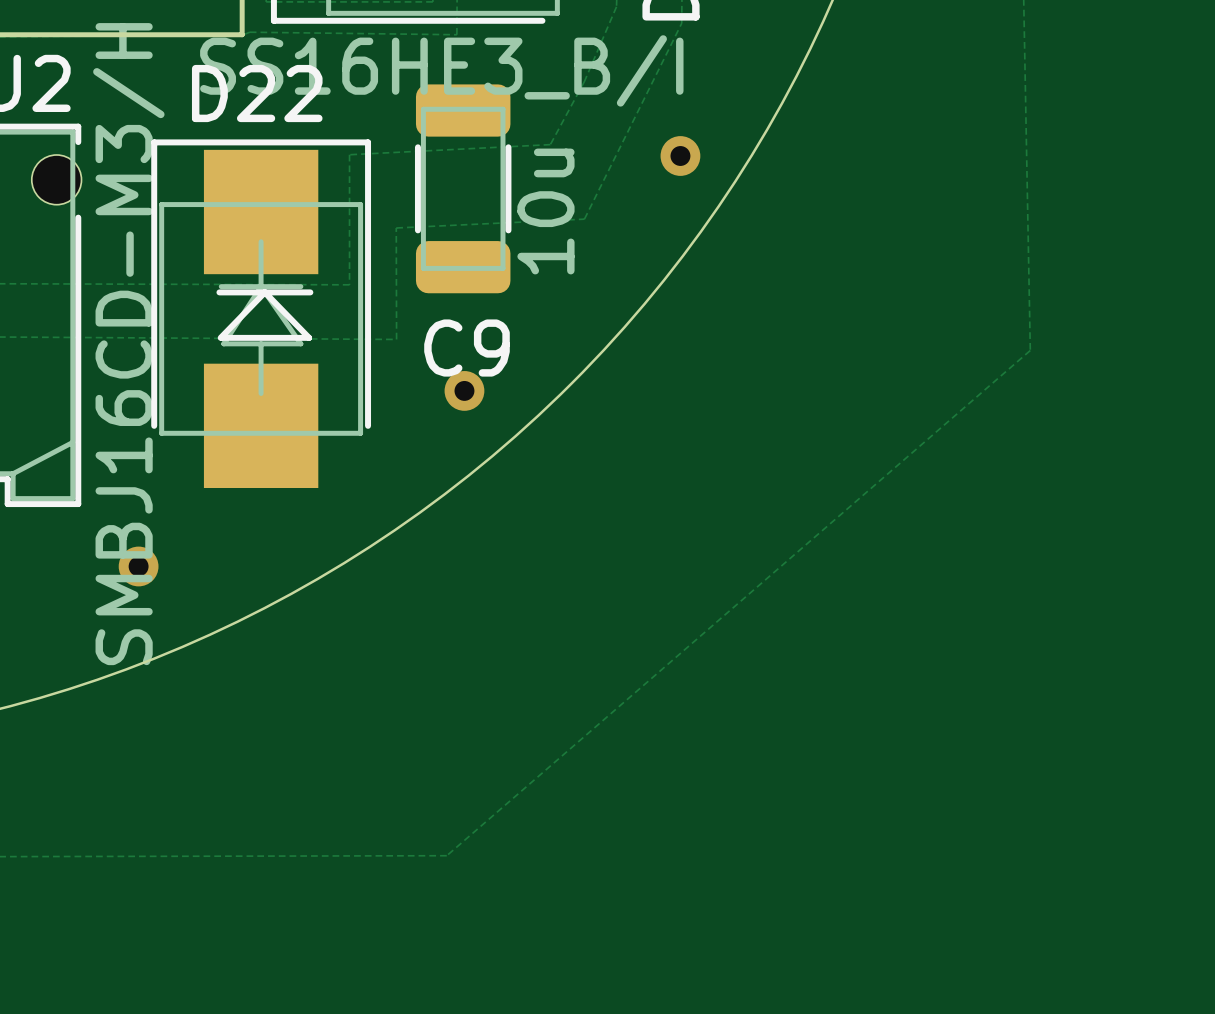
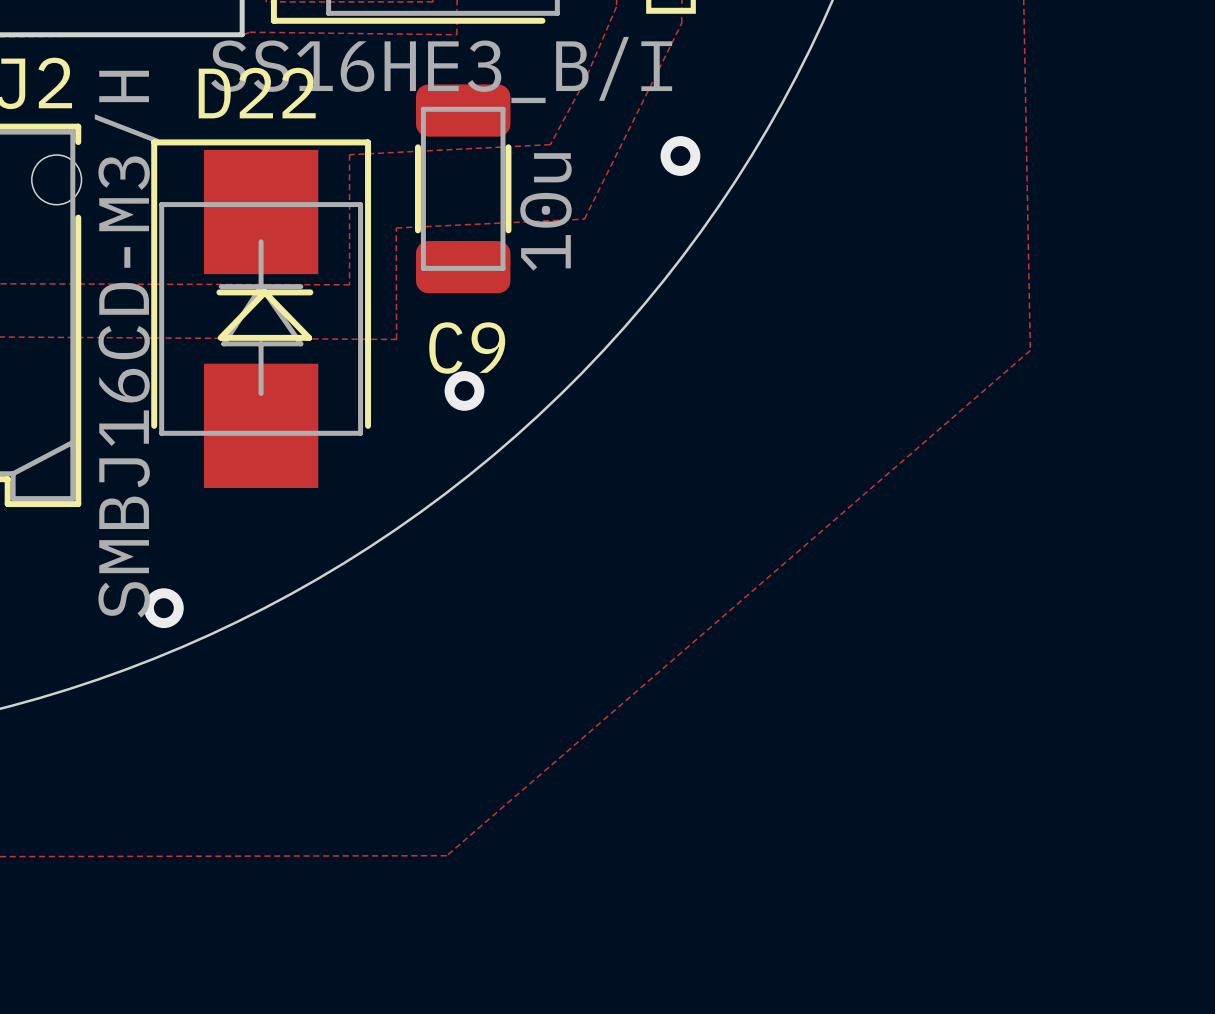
via position: (138, 566) -> (163, 608)

